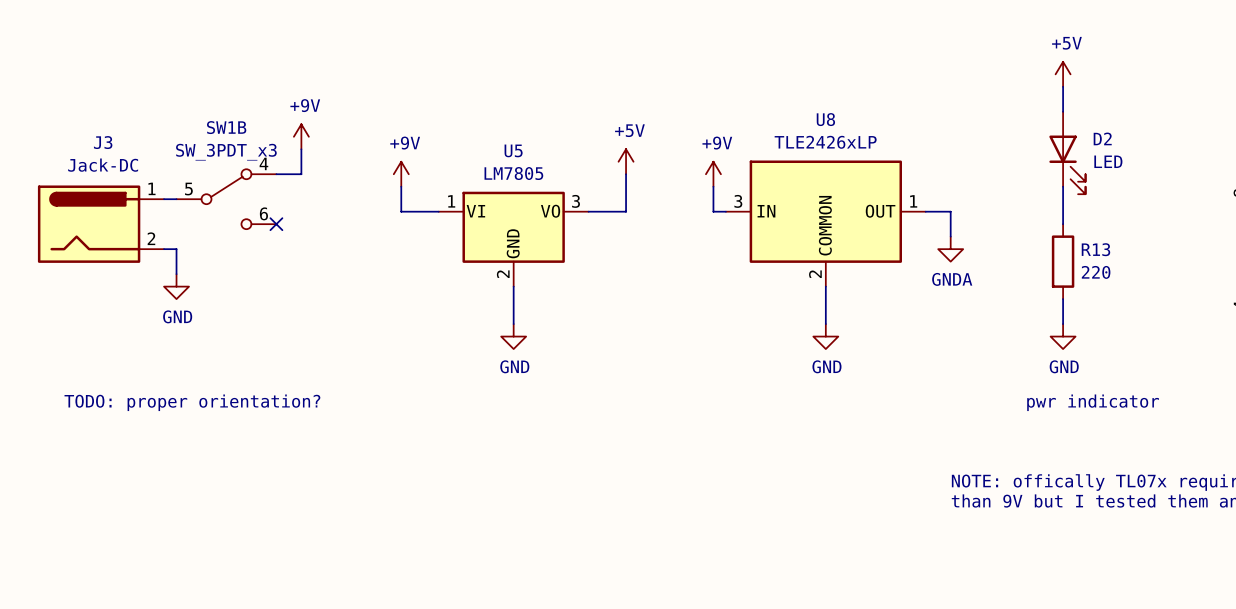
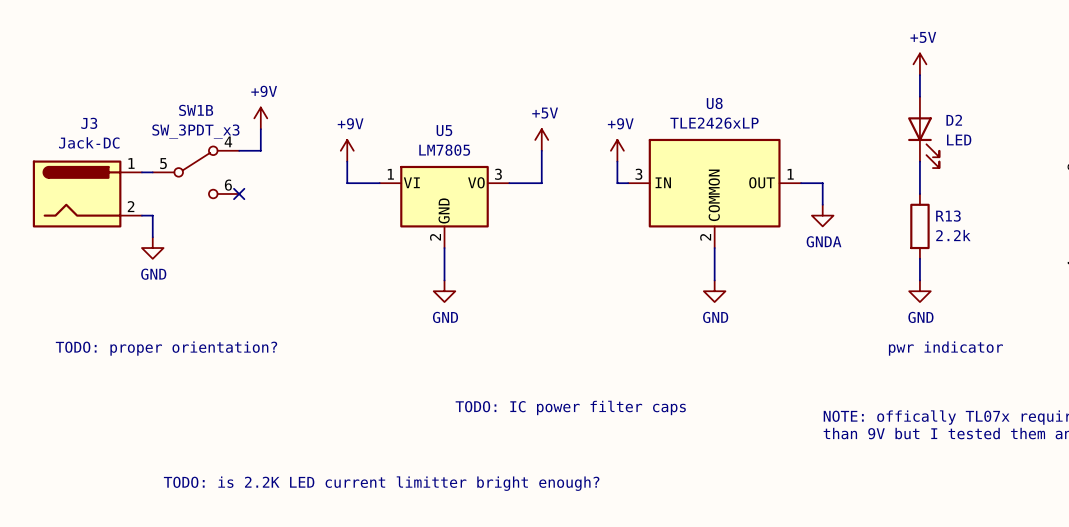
R13 value: 220 (1096, 272) -> 2.2k (953, 235)
text: none -> TODO: IC power filter caps (570, 407)
text: none -> TODO: is 2.2K LED current limitter bright enough? (381, 483)

